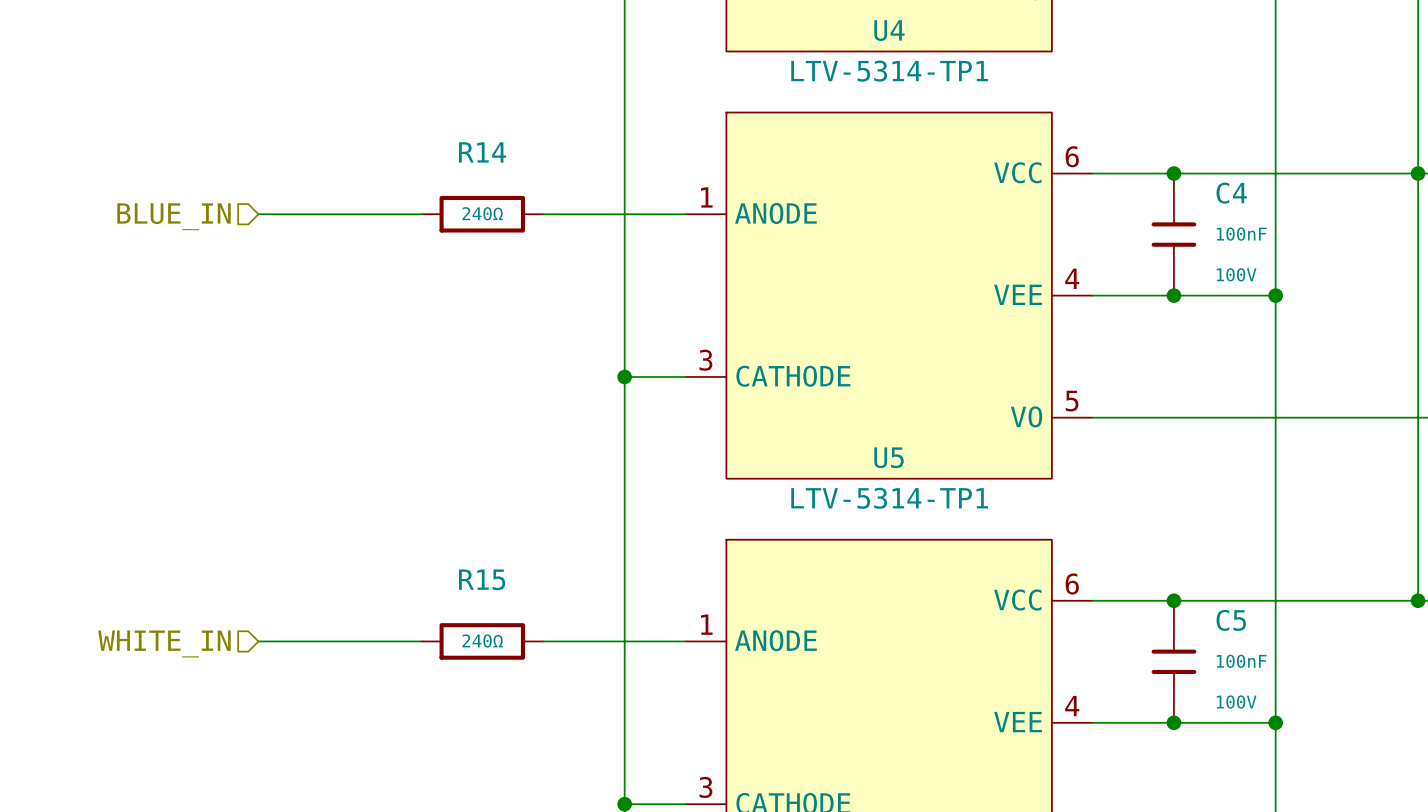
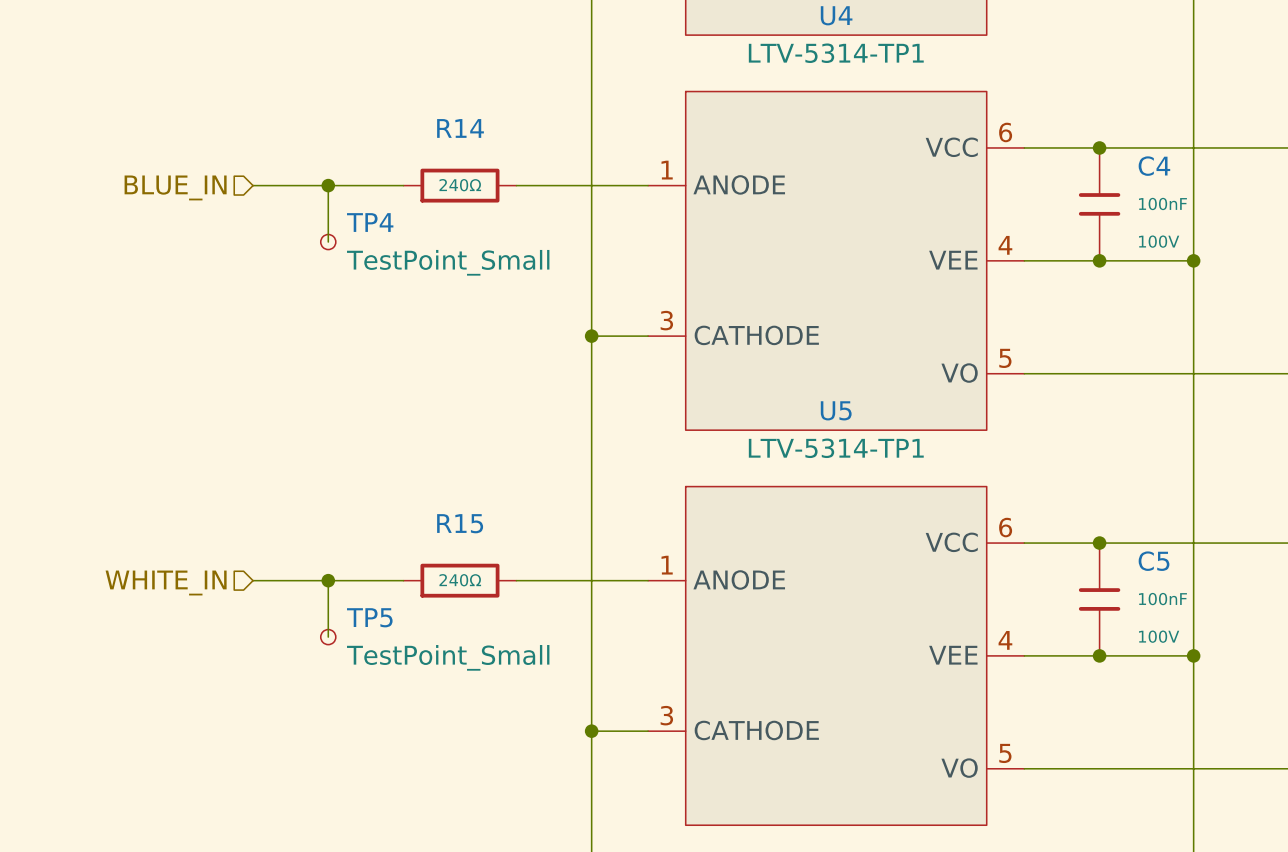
wire: none -> (328, 185) (328, 242)
junction: none -> (328, 185)
TP4: none -> TestPoint_Small (328, 242)
wire: none -> (328, 580) (328, 637)
junction: none -> (328, 580)
TP5: none -> TestPoint_Small (328, 637)

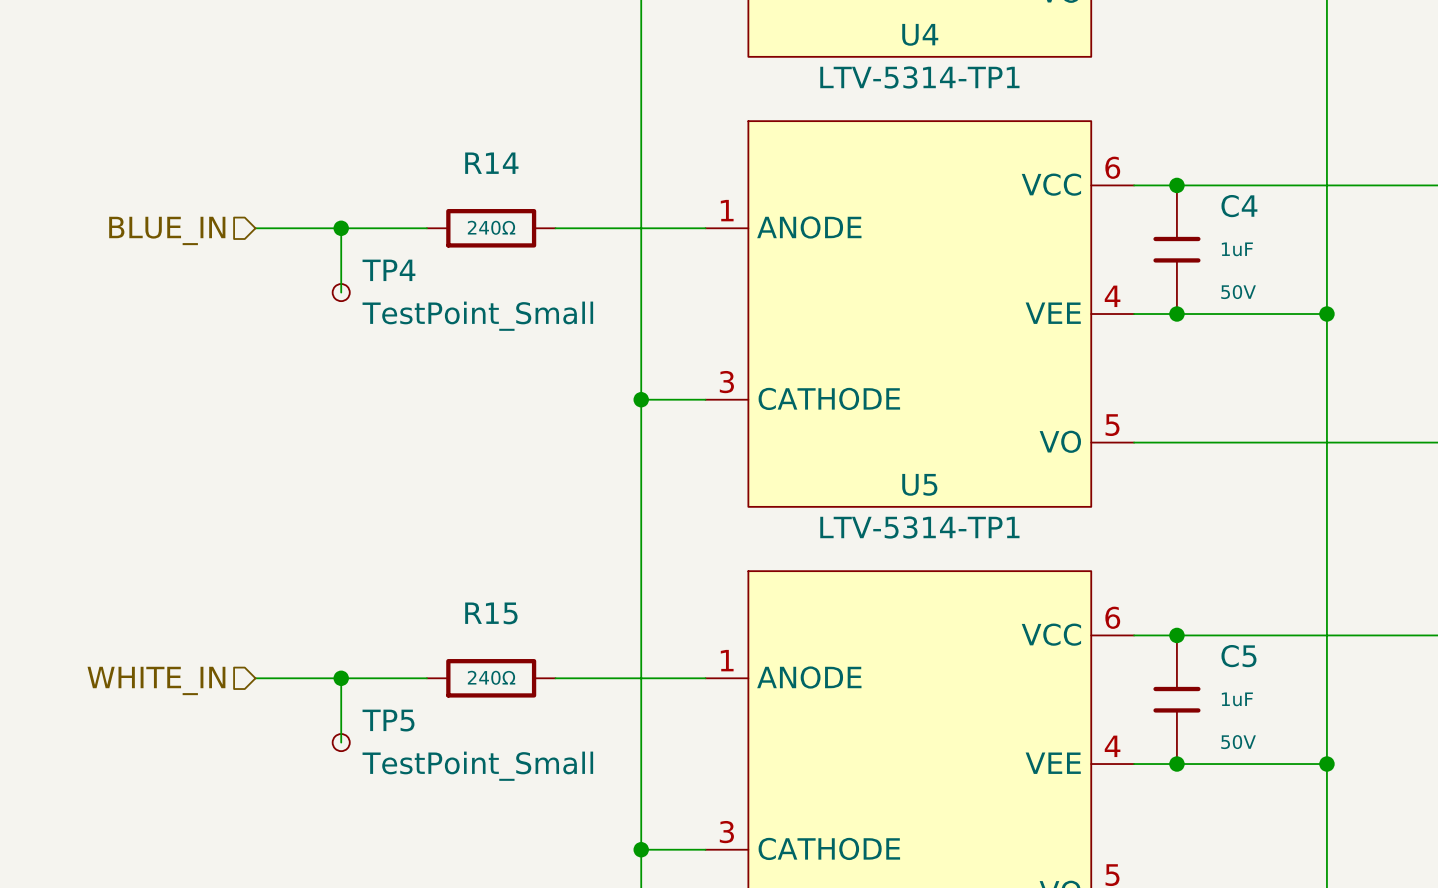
junction position: (1099, 147) -> (1176, 185)
C4 value: 100nF (1162, 203) -> 1uF (1237, 249)
C4 position: (1099, 204) -> (1176, 249)
C4 text: 100V (1159, 241) -> 50V (1238, 292)
junction position: (1099, 260) -> (1176, 314)
junction position: (1099, 543) -> (1176, 635)
C5 position: (1099, 599) -> (1176, 699)
C5 value: 100nF (1162, 599) -> 1uF (1237, 699)
C5 text: 100V (1159, 636) -> 50V (1238, 742)
junction position: (1099, 655) -> (1176, 764)

